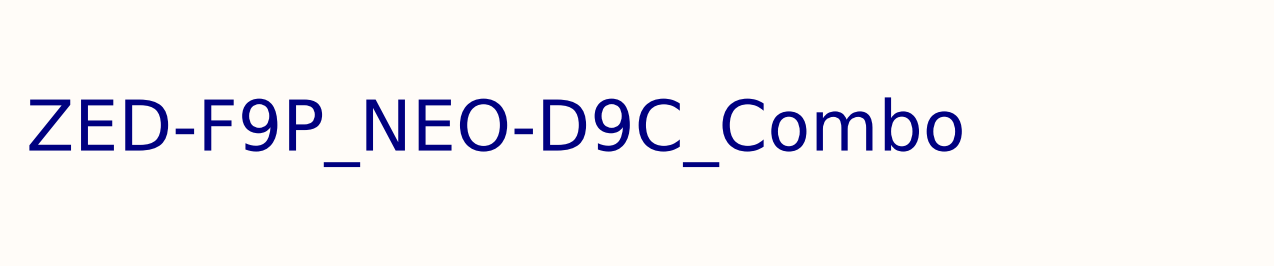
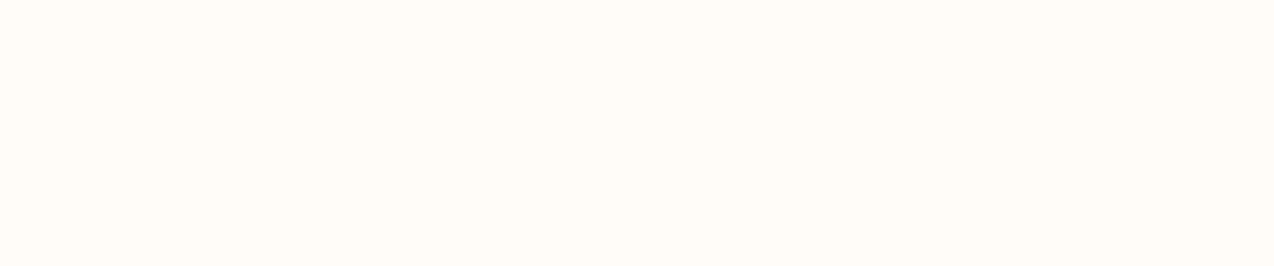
text: ZED-F9P_NEO-D9C_Combo (495, 132) -> none

